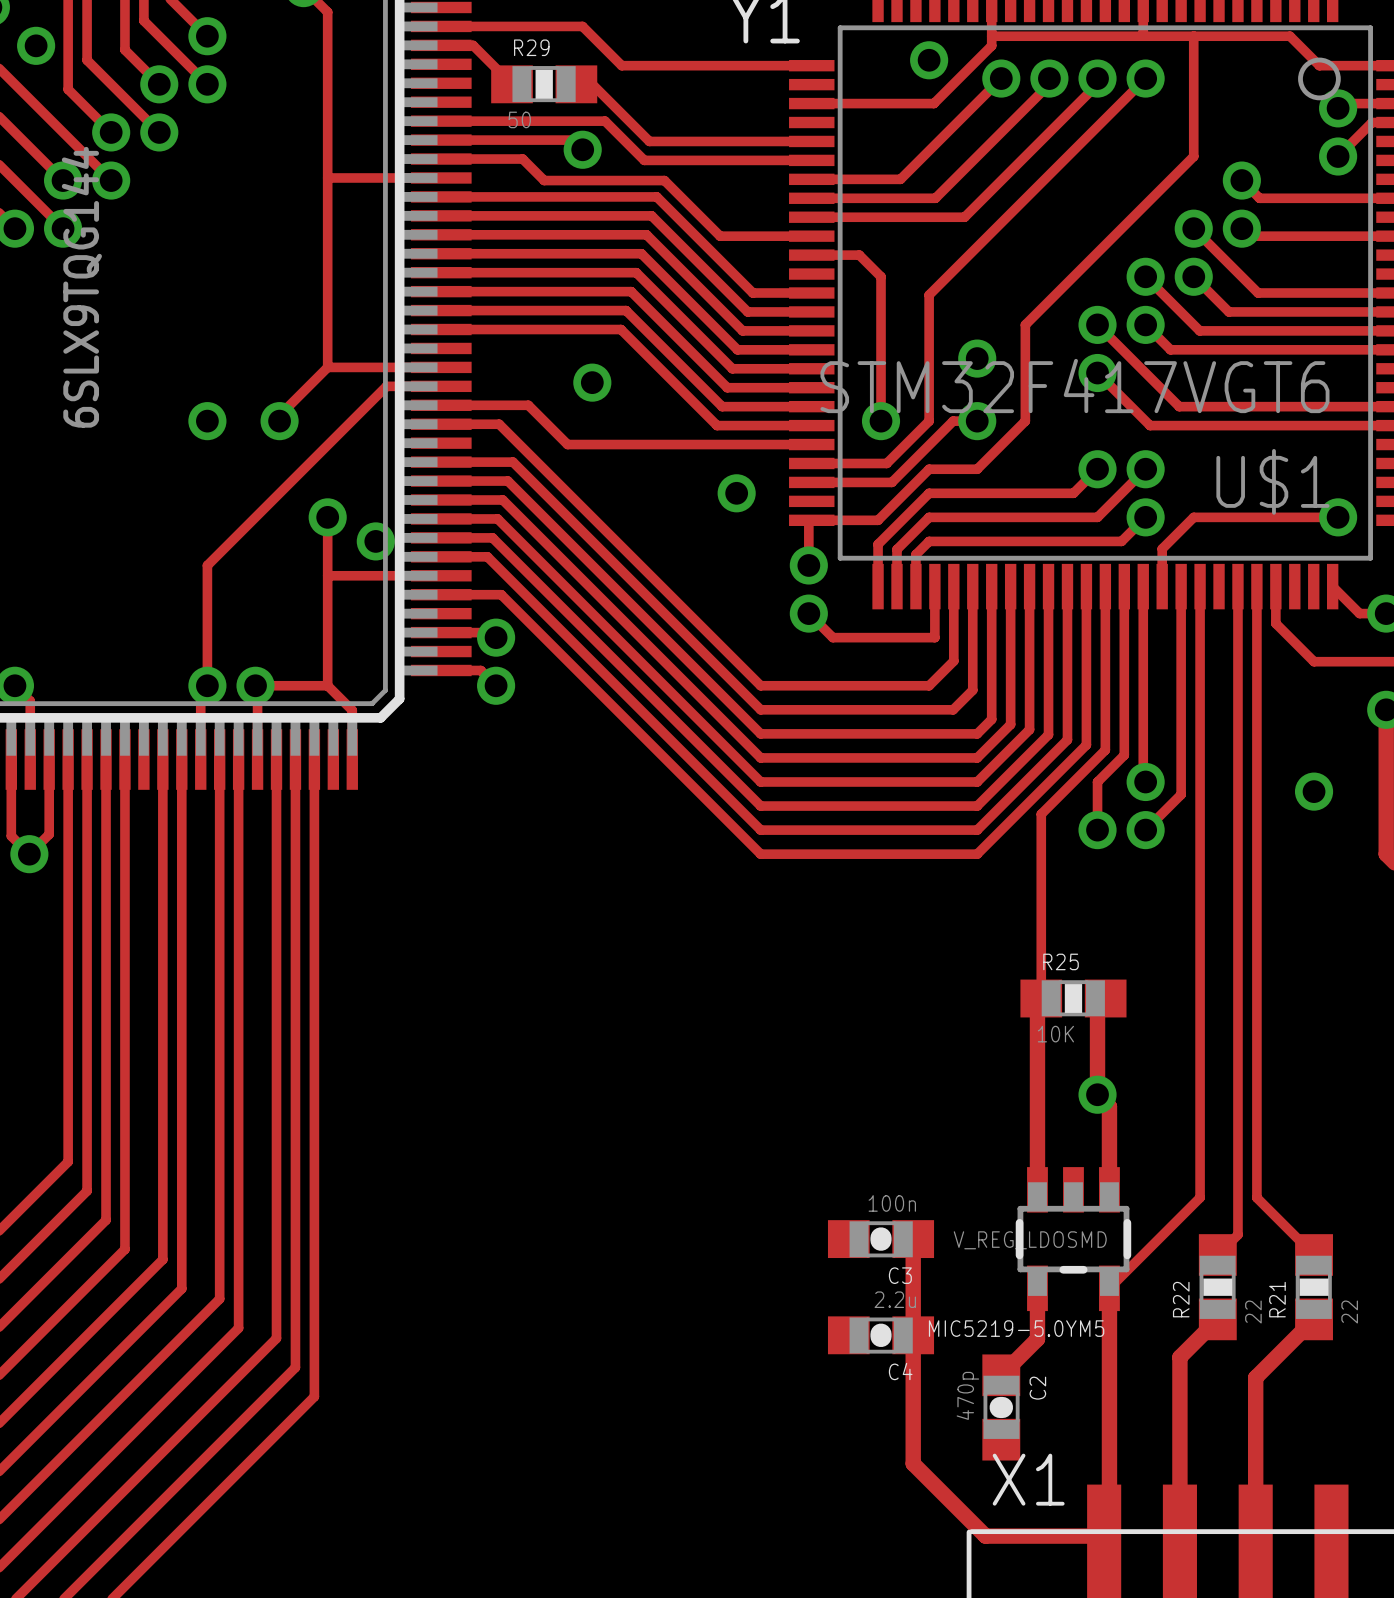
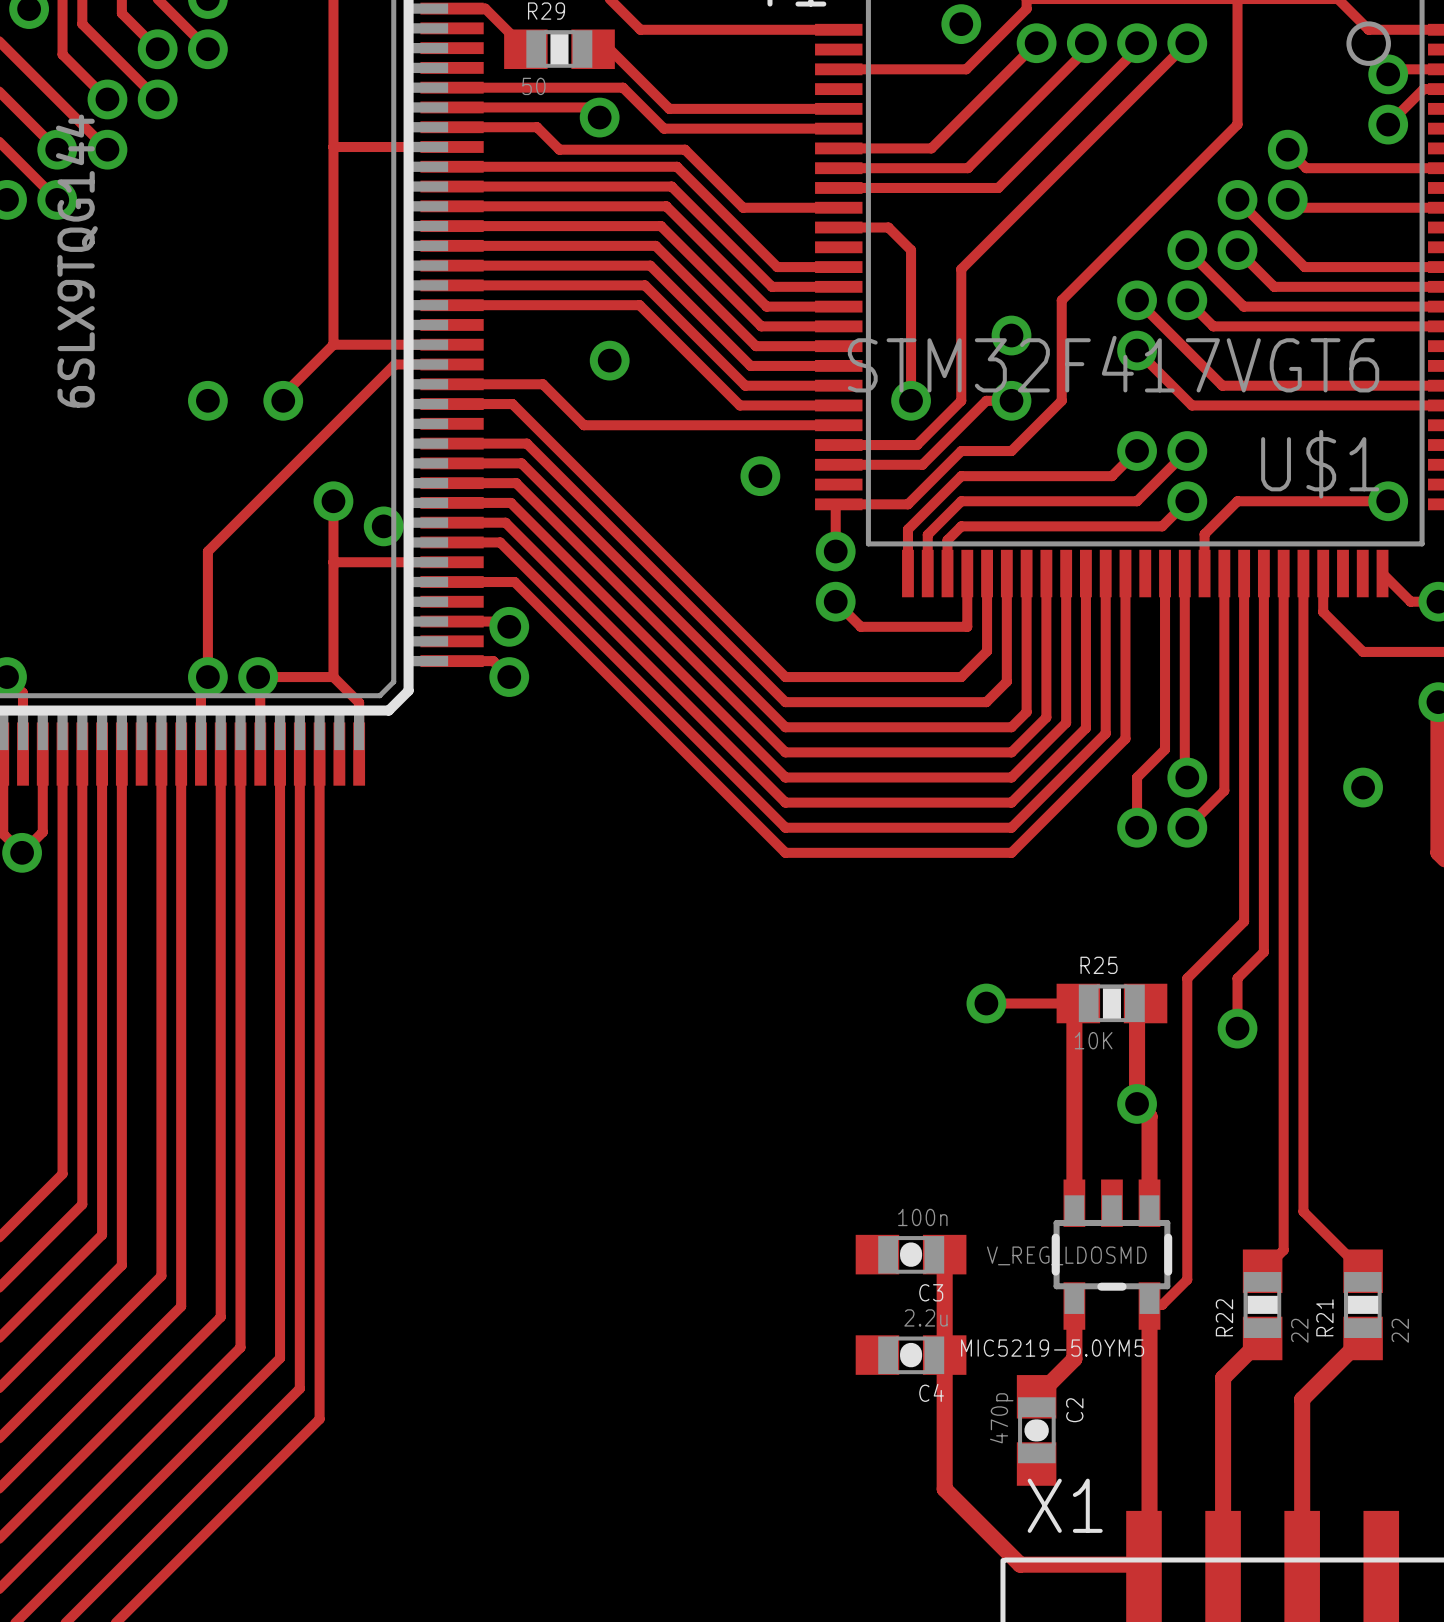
track: (1105, 586) (1105, 750) (1041, 814) (1041, 998) -> none
track: none -> (1263, 573) (1263, 952) (1237, 978) (1237, 1028)
track: (1200, 920) (1200, 1197) (1110, 1287) -> (1244, 921) (1187, 978) (1187, 1279) (1162, 1304) (1150, 1304)
track: none -> (986, 1003) (1070, 1003) (1074, 1007)
via: none -> (986, 1003)
via: none -> (1237, 1028)

